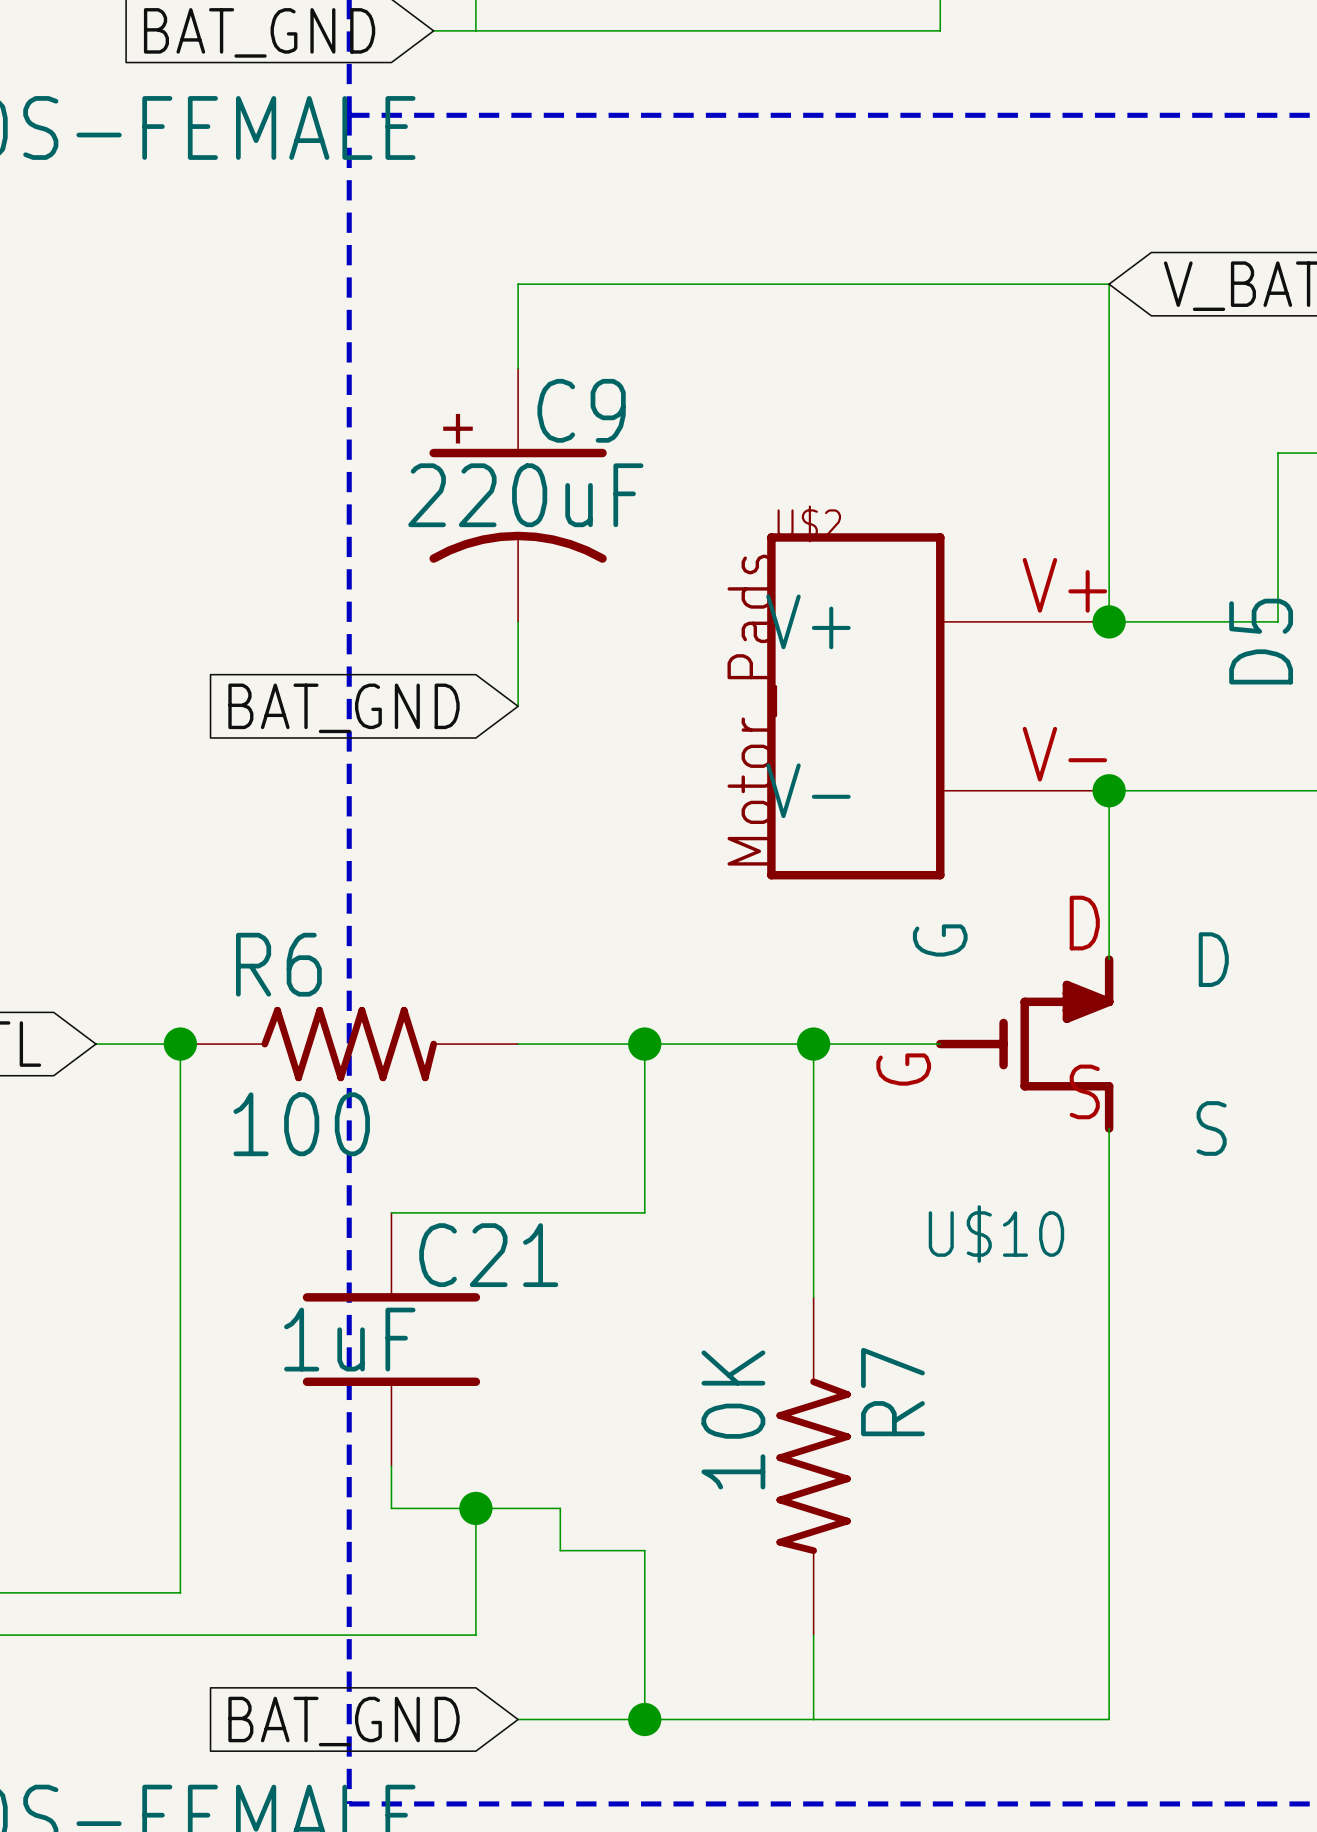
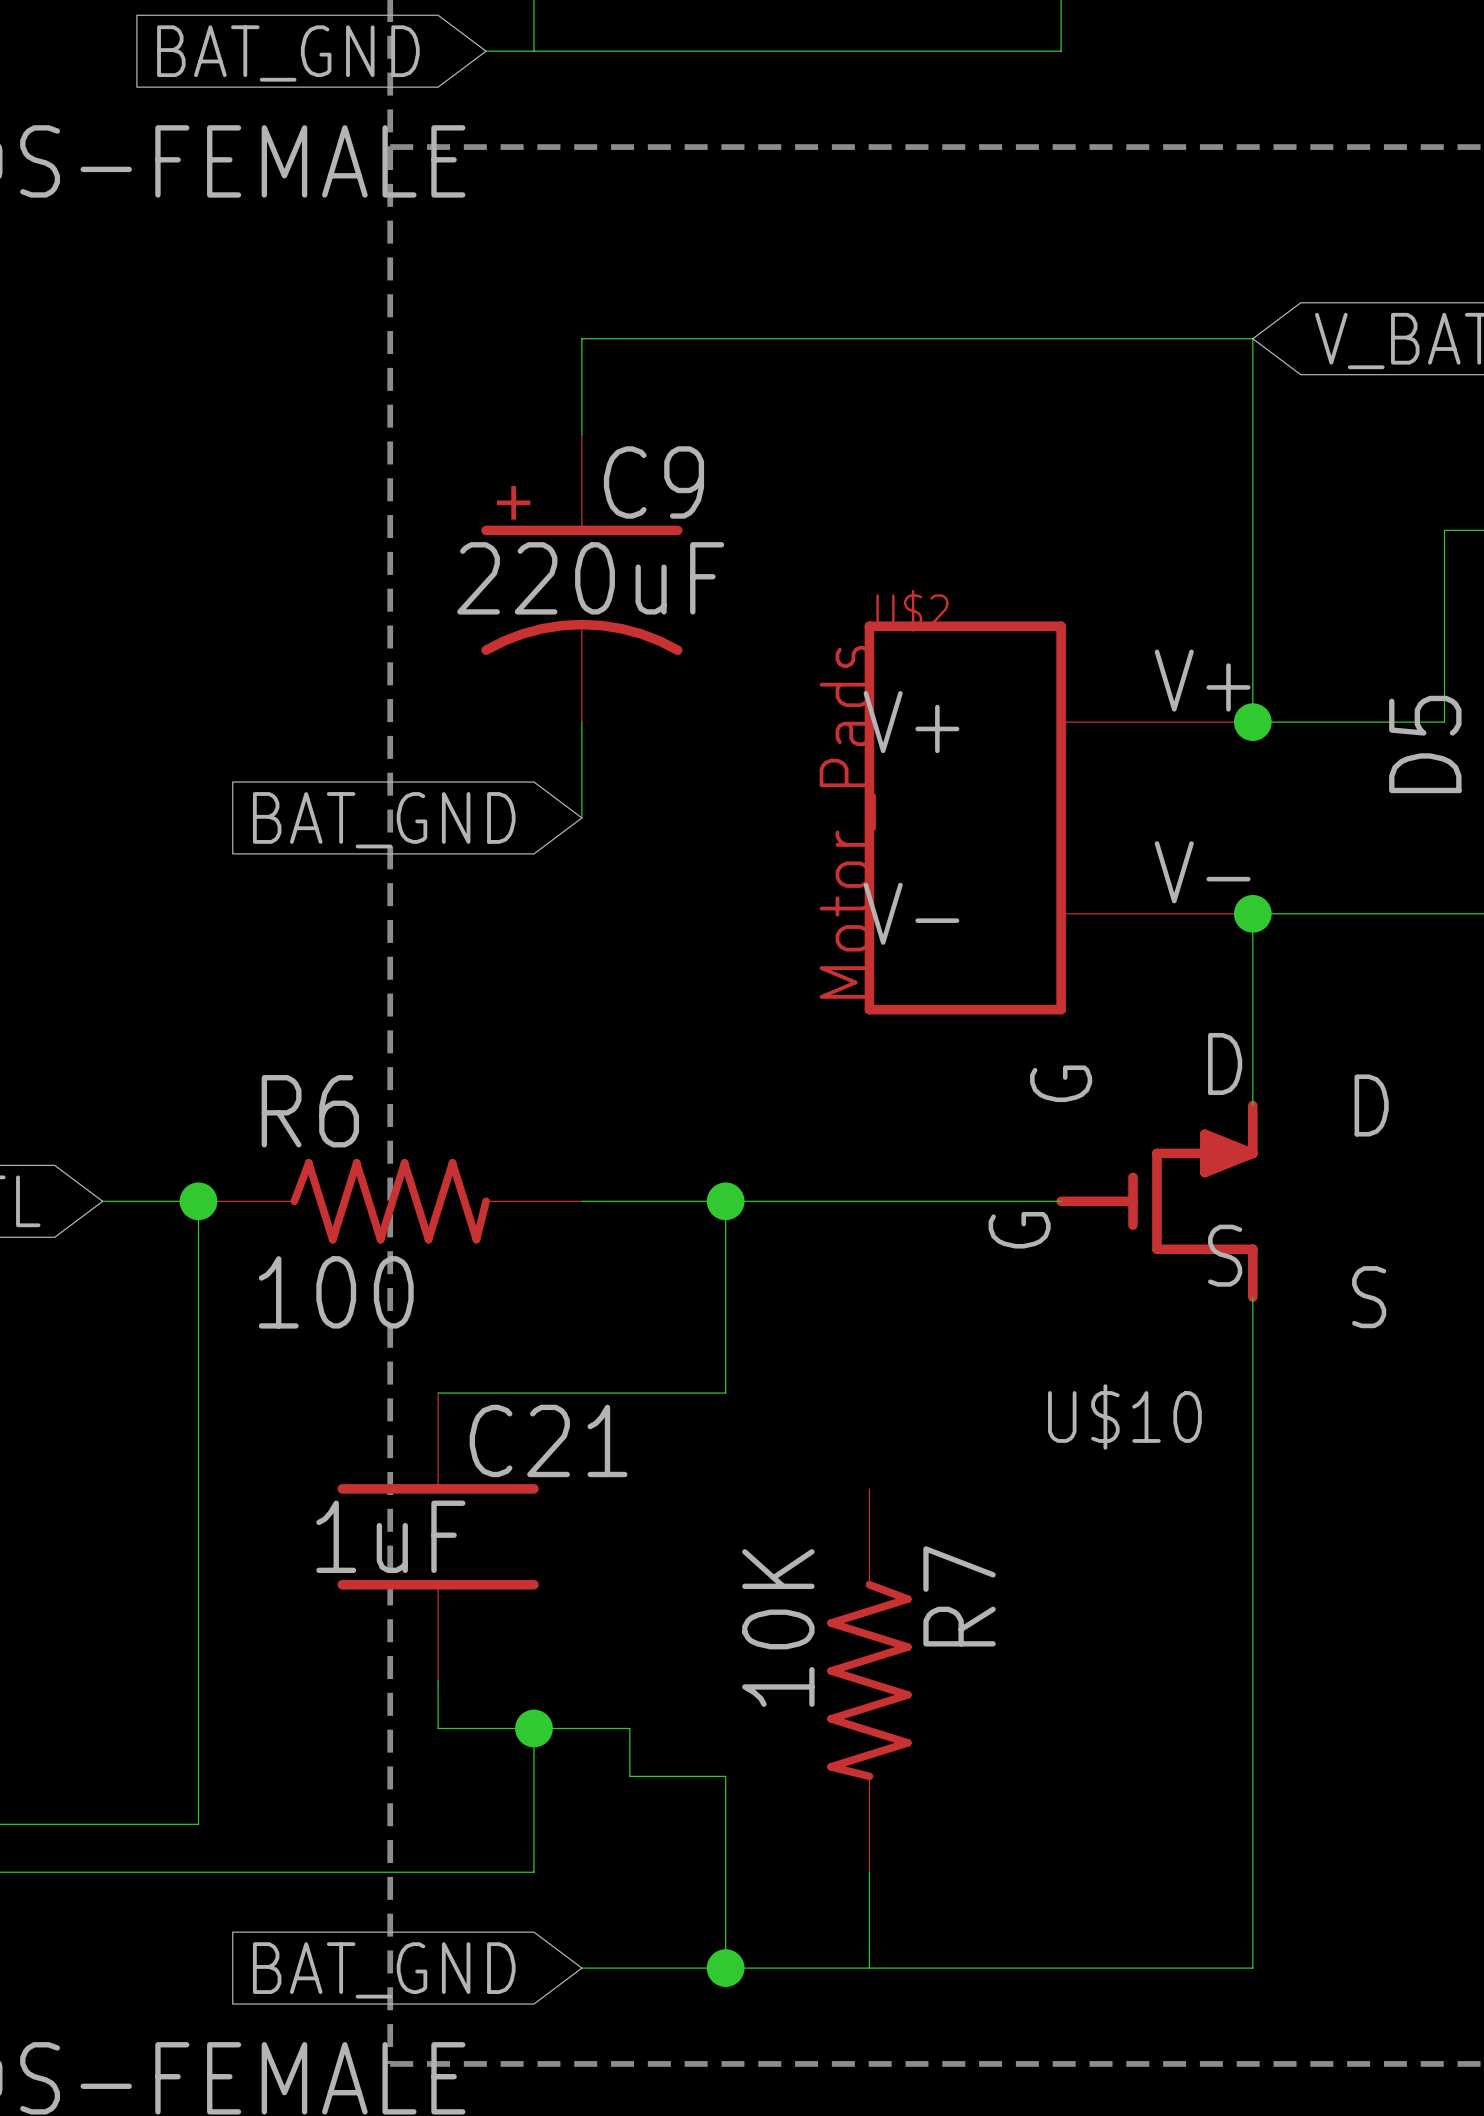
wire: (813, 1044) (813, 1297) -> none
junction: (813, 1044) -> none
R7 position: (813, 1466) -> (869, 1680)
wire: (813, 1635) (813, 1719) -> (869, 1872) (869, 1968)

